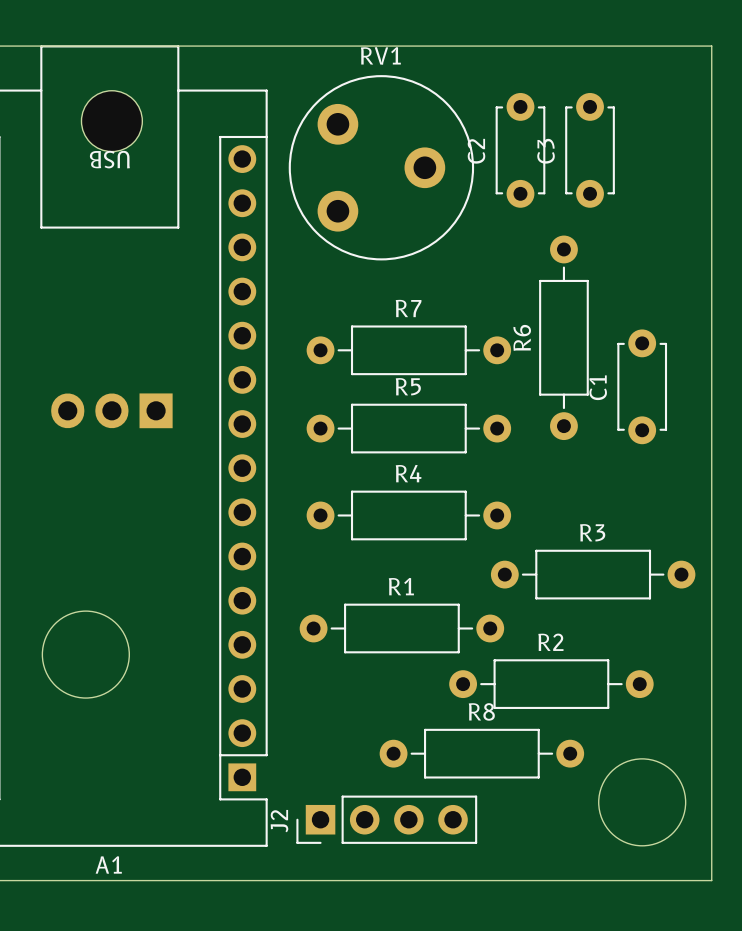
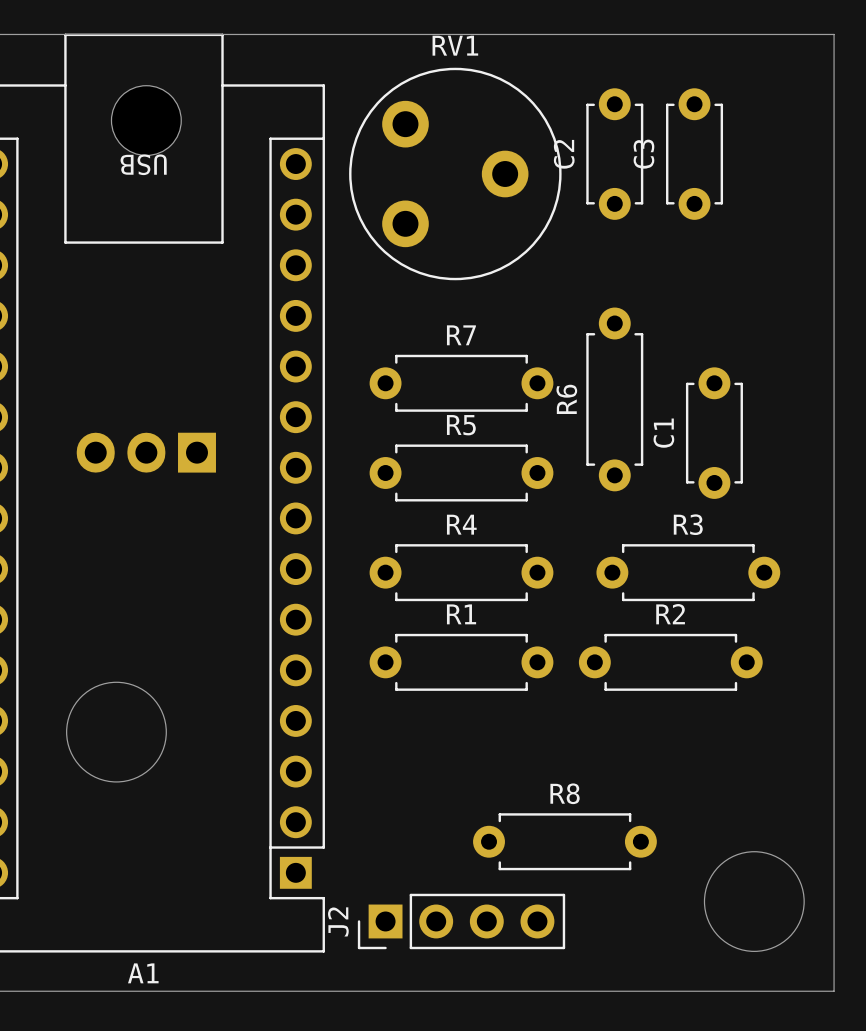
R6 footprint: [539, 235, 589, 441] -> [586, 307, 644, 492]
R7 footprint: [306, 325, 512, 376] -> [369, 354, 554, 412]
C1 position: (642, 386) -> (714, 433)
R5 footprint: [306, 403, 512, 454] -> [369, 444, 554, 502]
R4 footprint: [306, 490, 512, 541] -> [369, 544, 554, 602]
R3 footprint: [490, 549, 696, 600] -> [596, 544, 781, 602]
R1 footprint: [299, 603, 505, 654] -> [369, 633, 554, 691]
R2 footprint: [449, 659, 654, 709] -> [578, 633, 763, 691]
R8 footprint: [379, 728, 585, 779] -> [473, 813, 657, 871]

